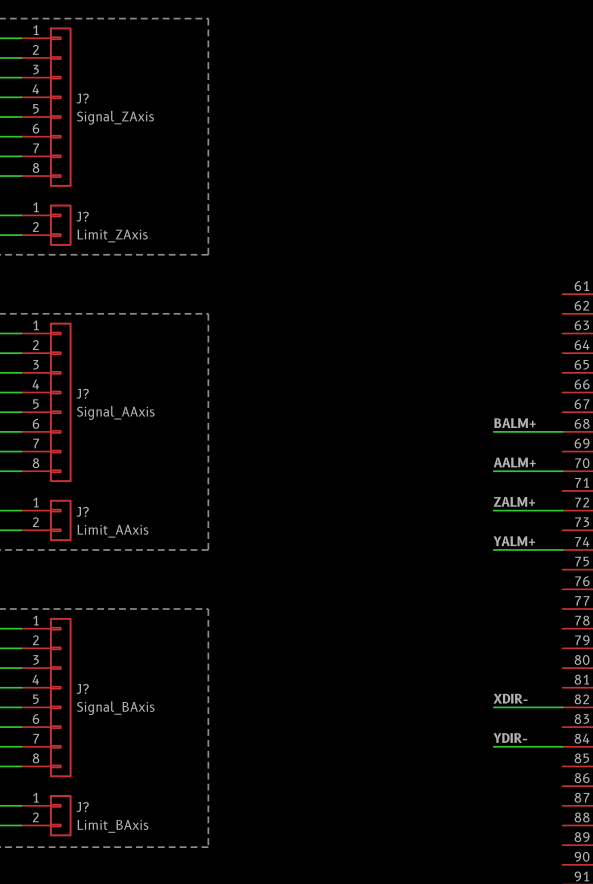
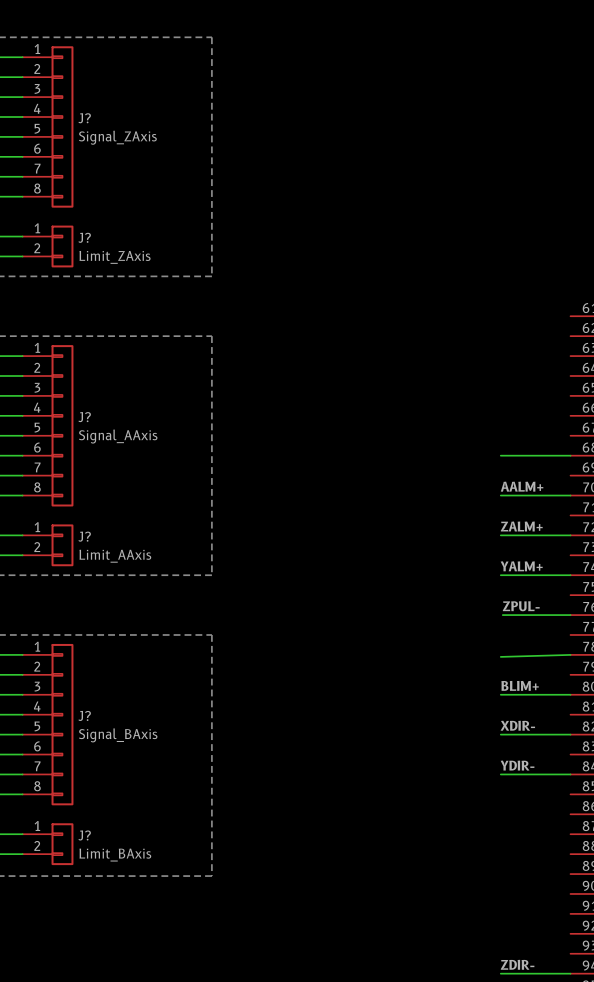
label: BALM+ (515, 423) -> none
label: none -> ZPUL- (521, 606)
wire: none -> (502, 615) (570, 615)
wire: none -> (570, 654) (500, 656)
label: none -> BLIM+ (520, 685)
wire: none -> (500, 694) (570, 694)

